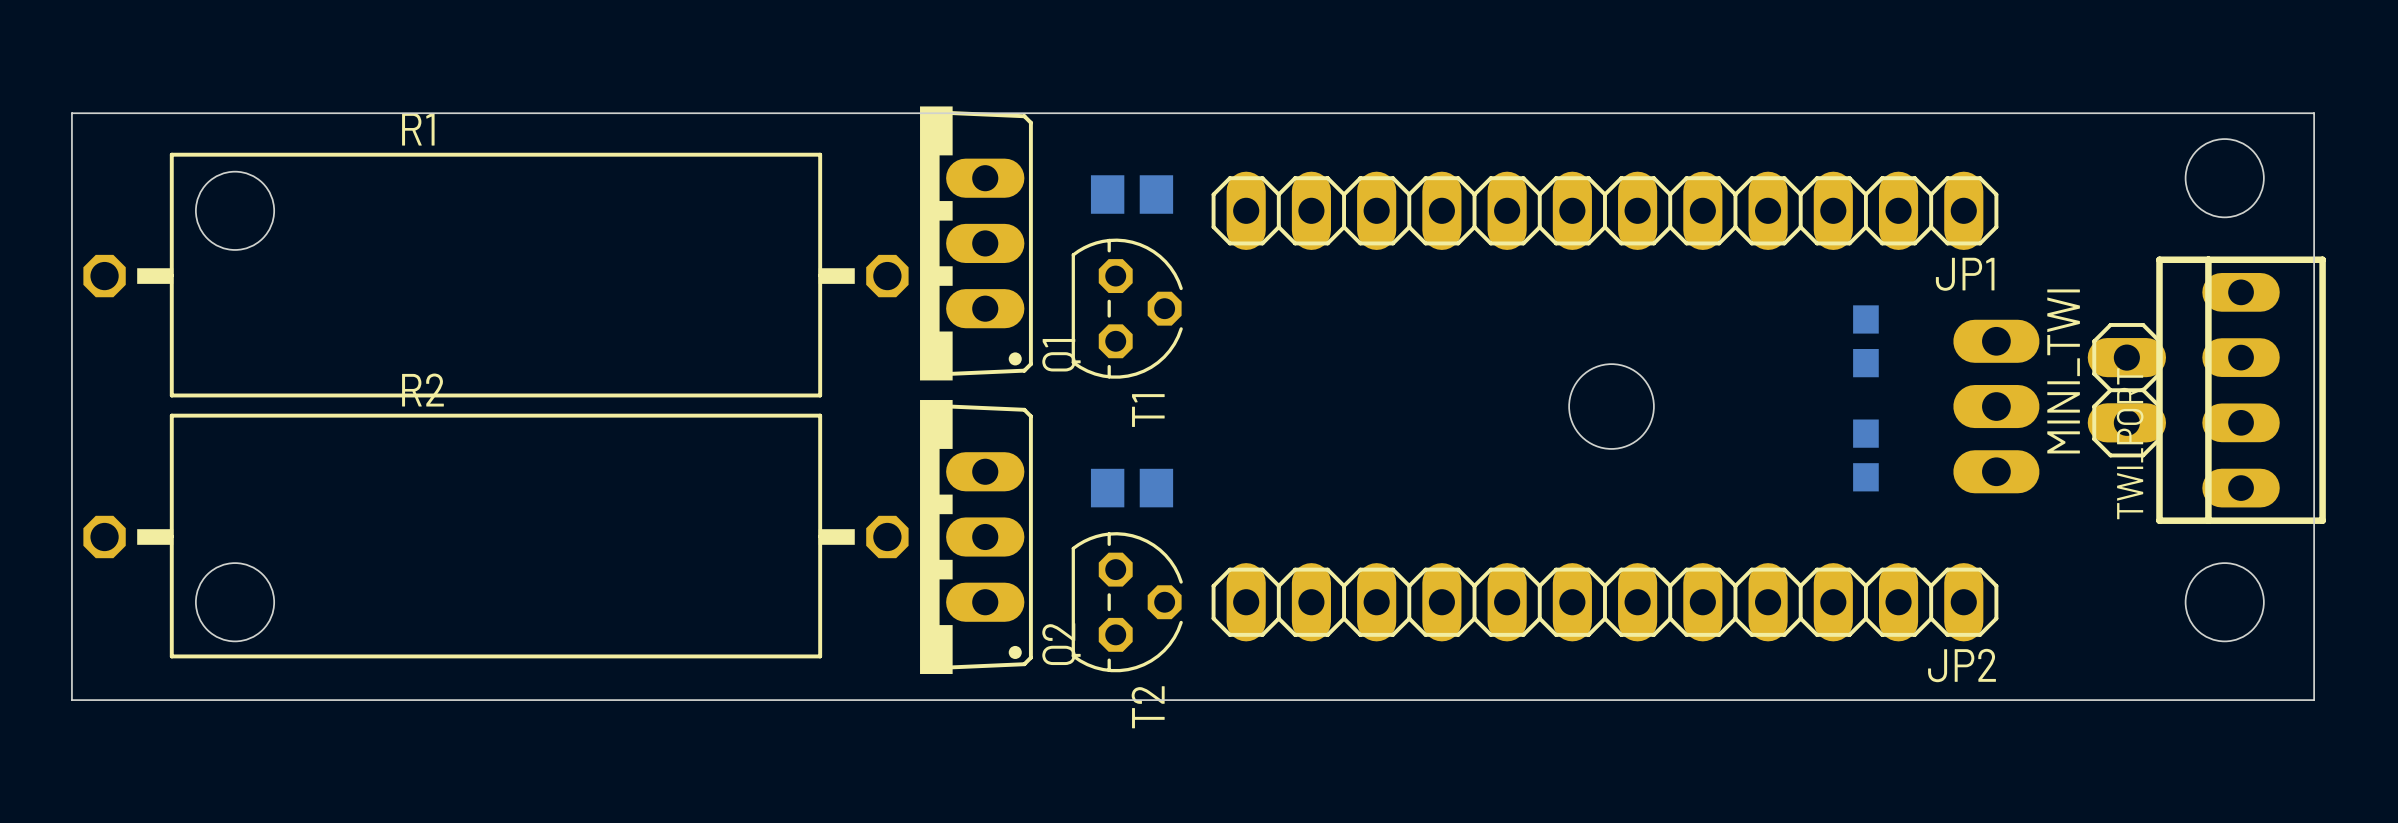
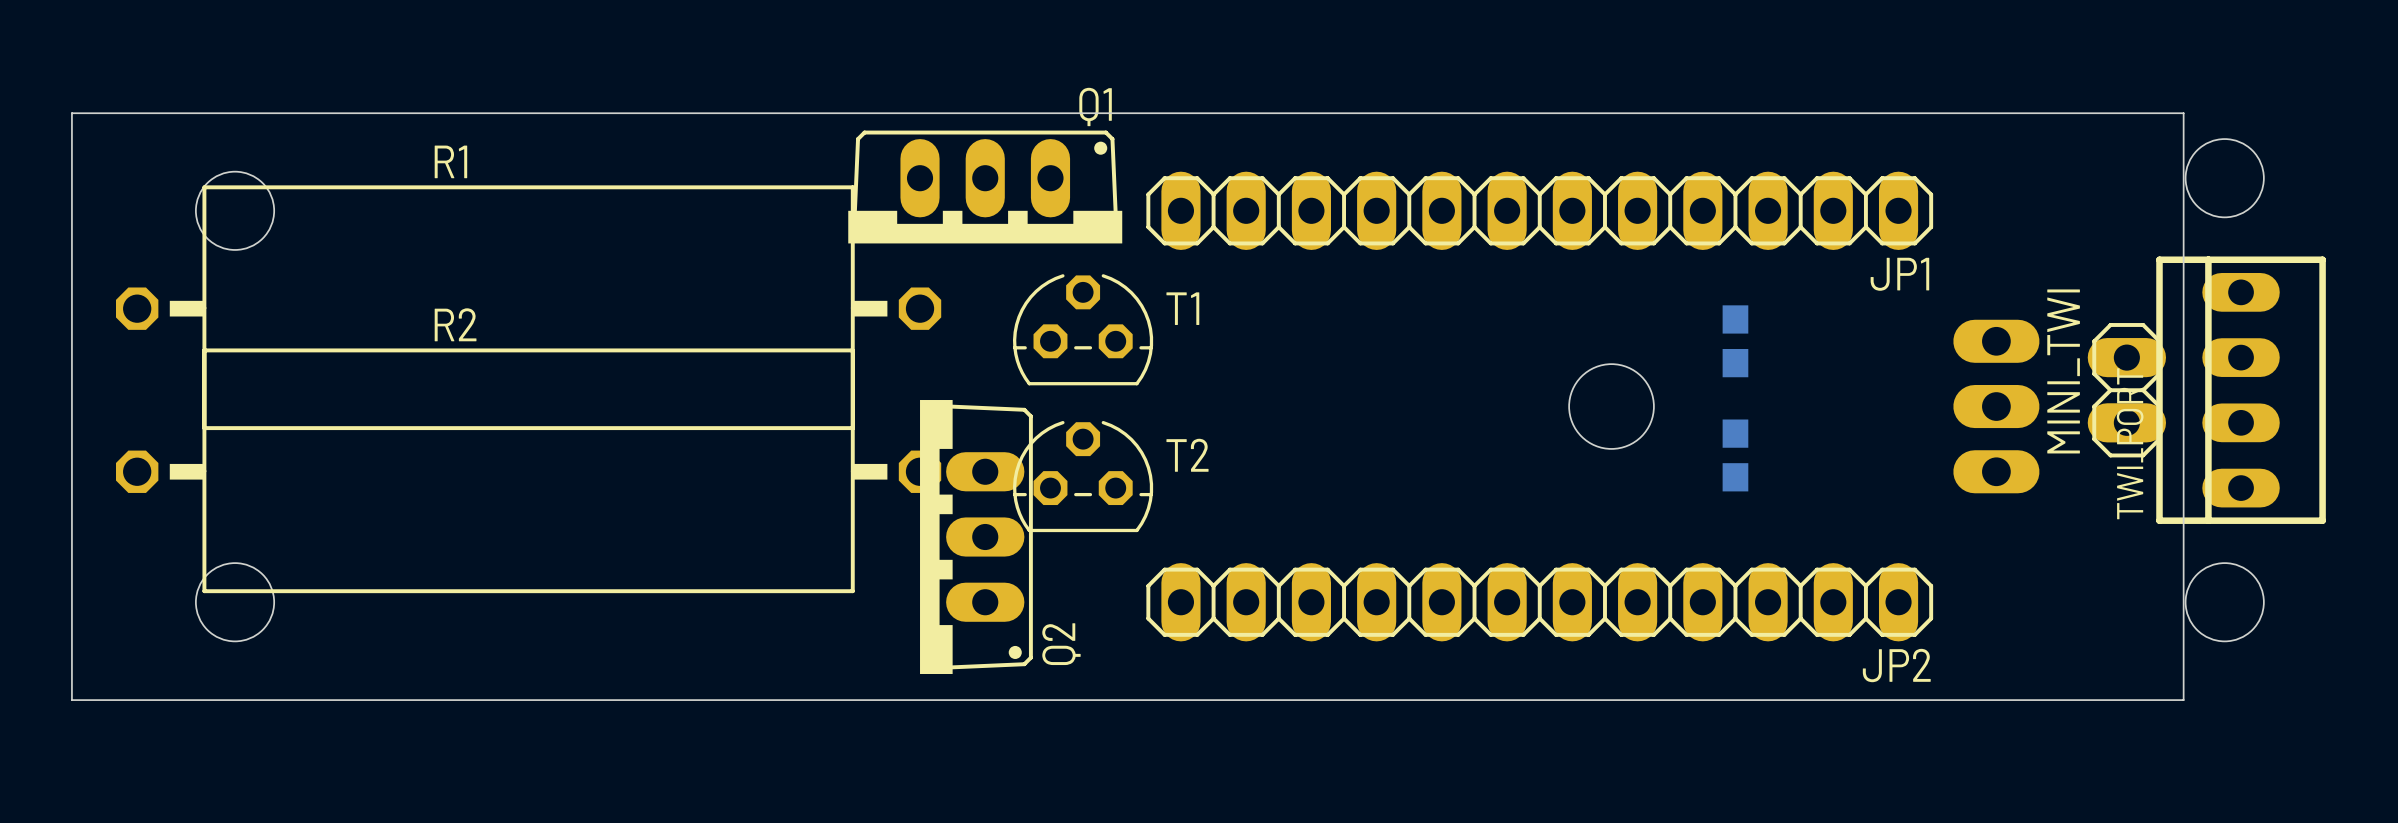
board edge: (2183, 113) (2314, 113) (2314, 700) (2183, 700) -> (2183, 113) (2183, 700)
part: (1132, 194) -> none
JP1 position: (1604, 210) -> (1539, 210)
Q1 rotation: 0° (976, 243) -> 90° counterclockwise (985, 187)
R1 position: (495, 275) -> (528, 307)
T1 rotation: 0° (1127, 308) -> 90° counterclockwise (1083, 329)
part: none -> (1735, 341)
part: (1865, 341) -> none
part: none -> (1735, 455)
part: (1865, 455) -> none
part: (1132, 488) -> none
R2 position: (495, 536) -> (528, 470)
T2 rotation: 0° (1127, 602) -> 90° counterclockwise (1083, 476)
T2 position: (1127, 602) -> (1083, 476)
JP2 position: (1604, 602) -> (1539, 602)

